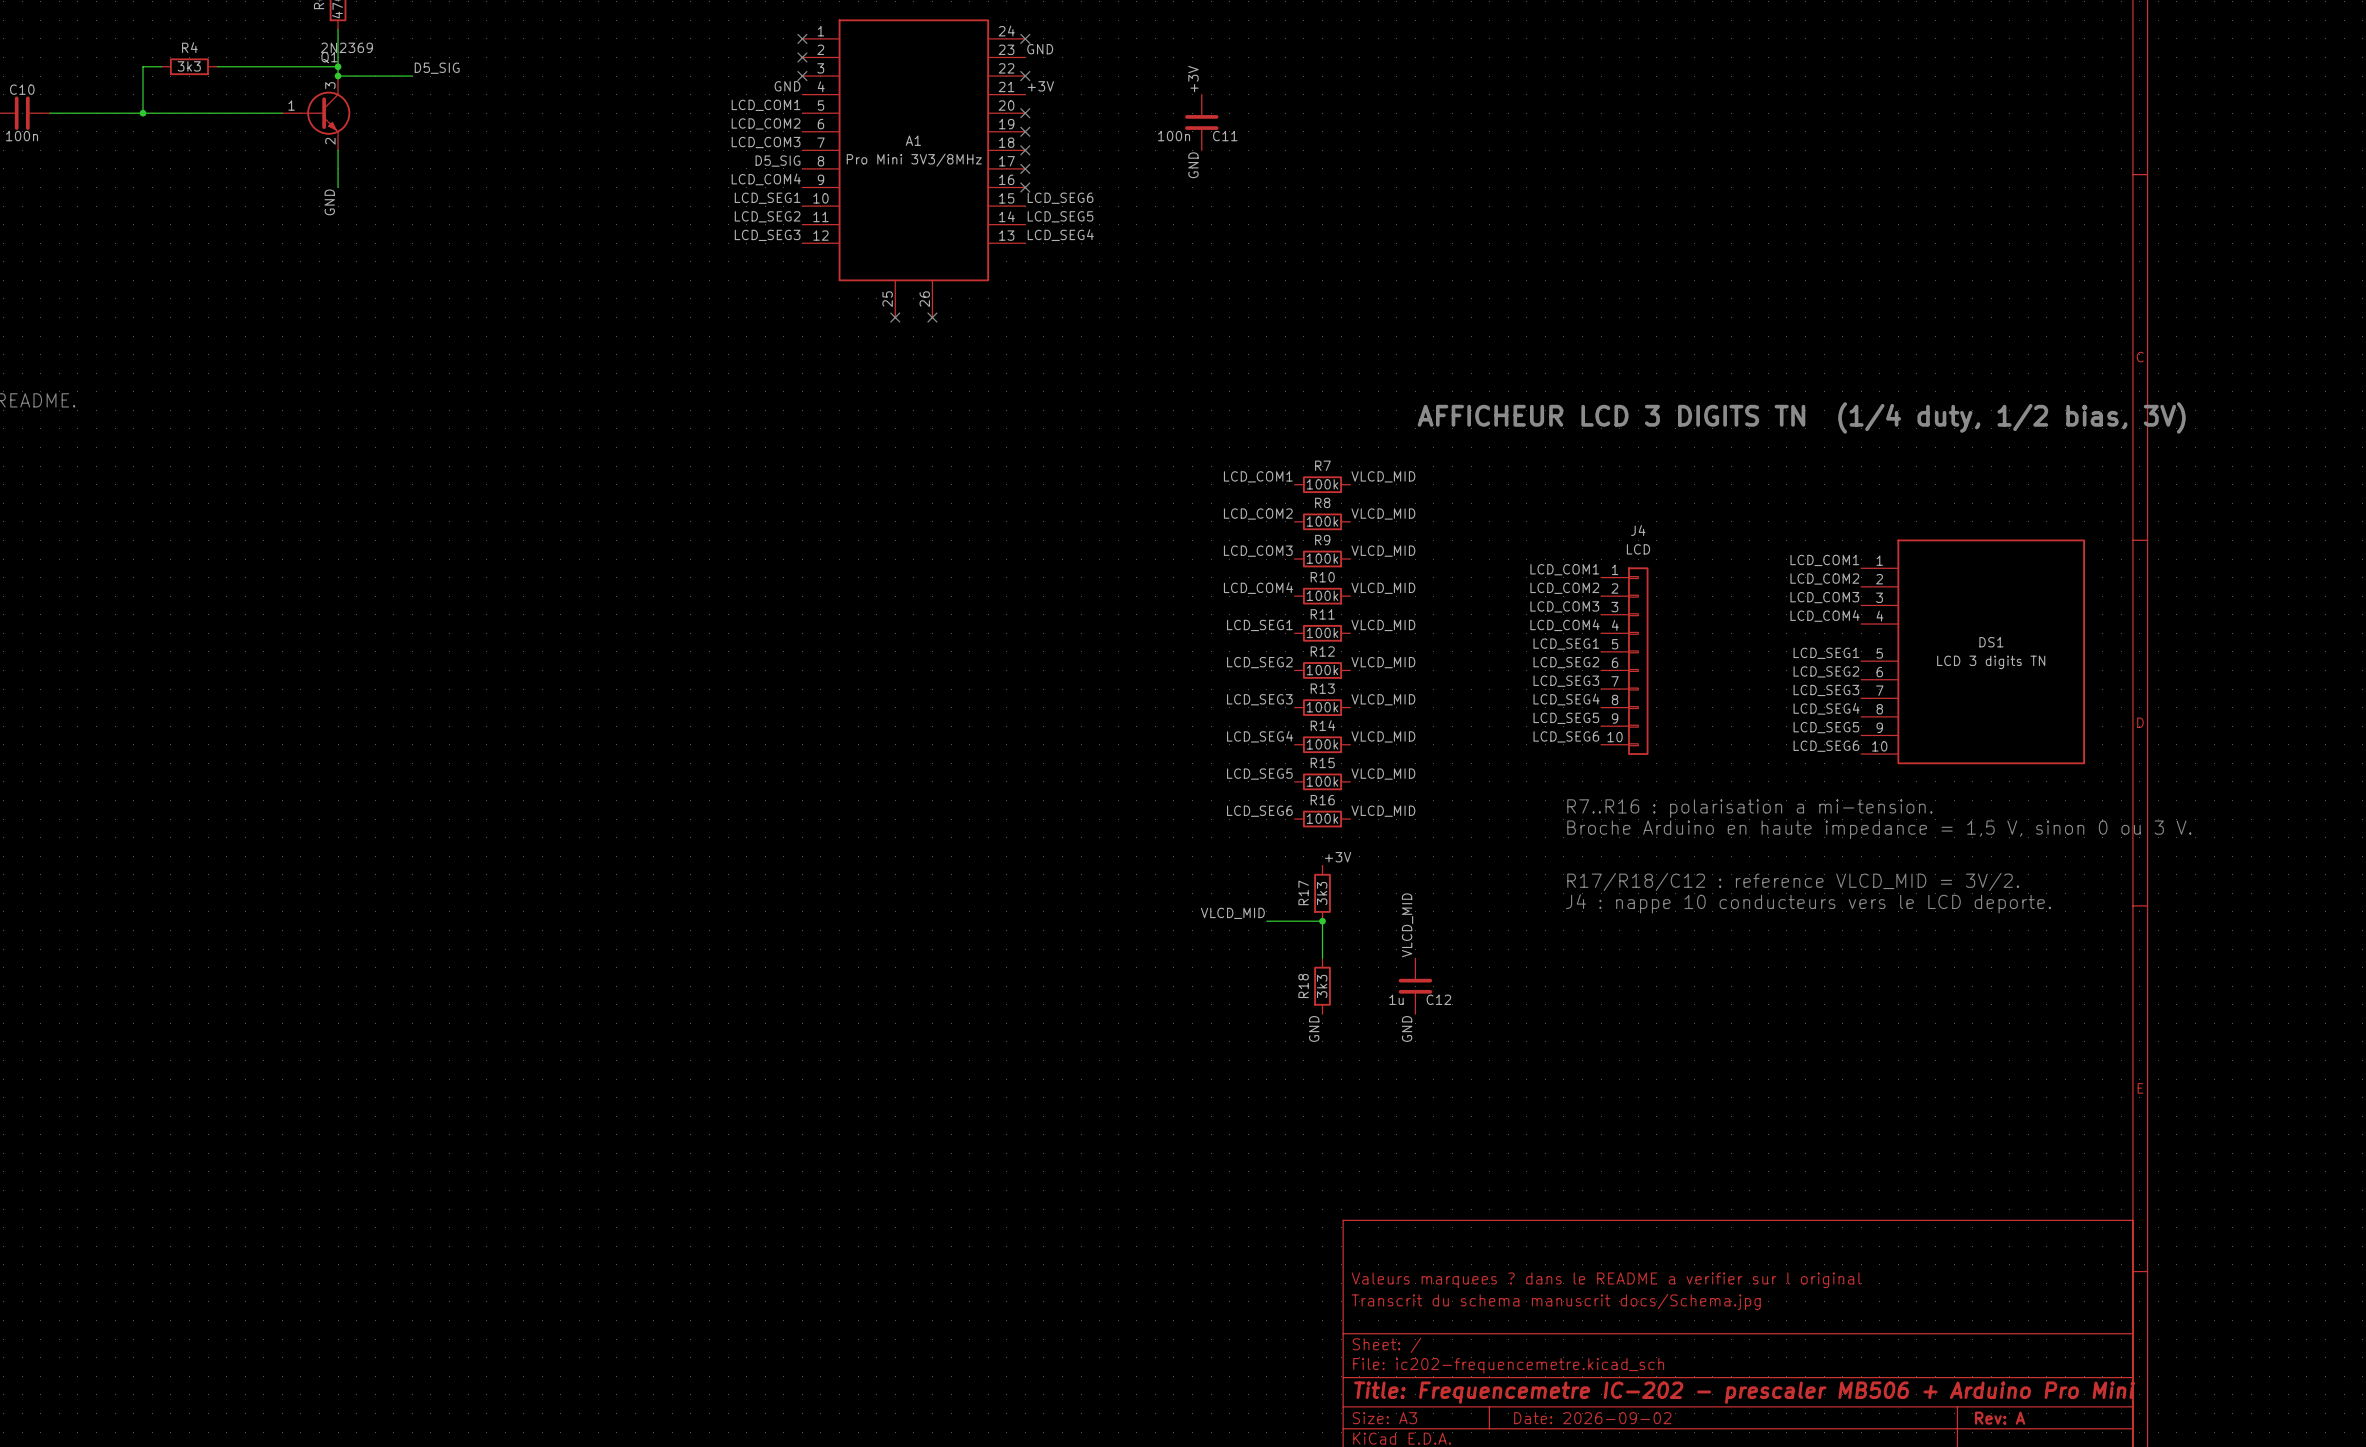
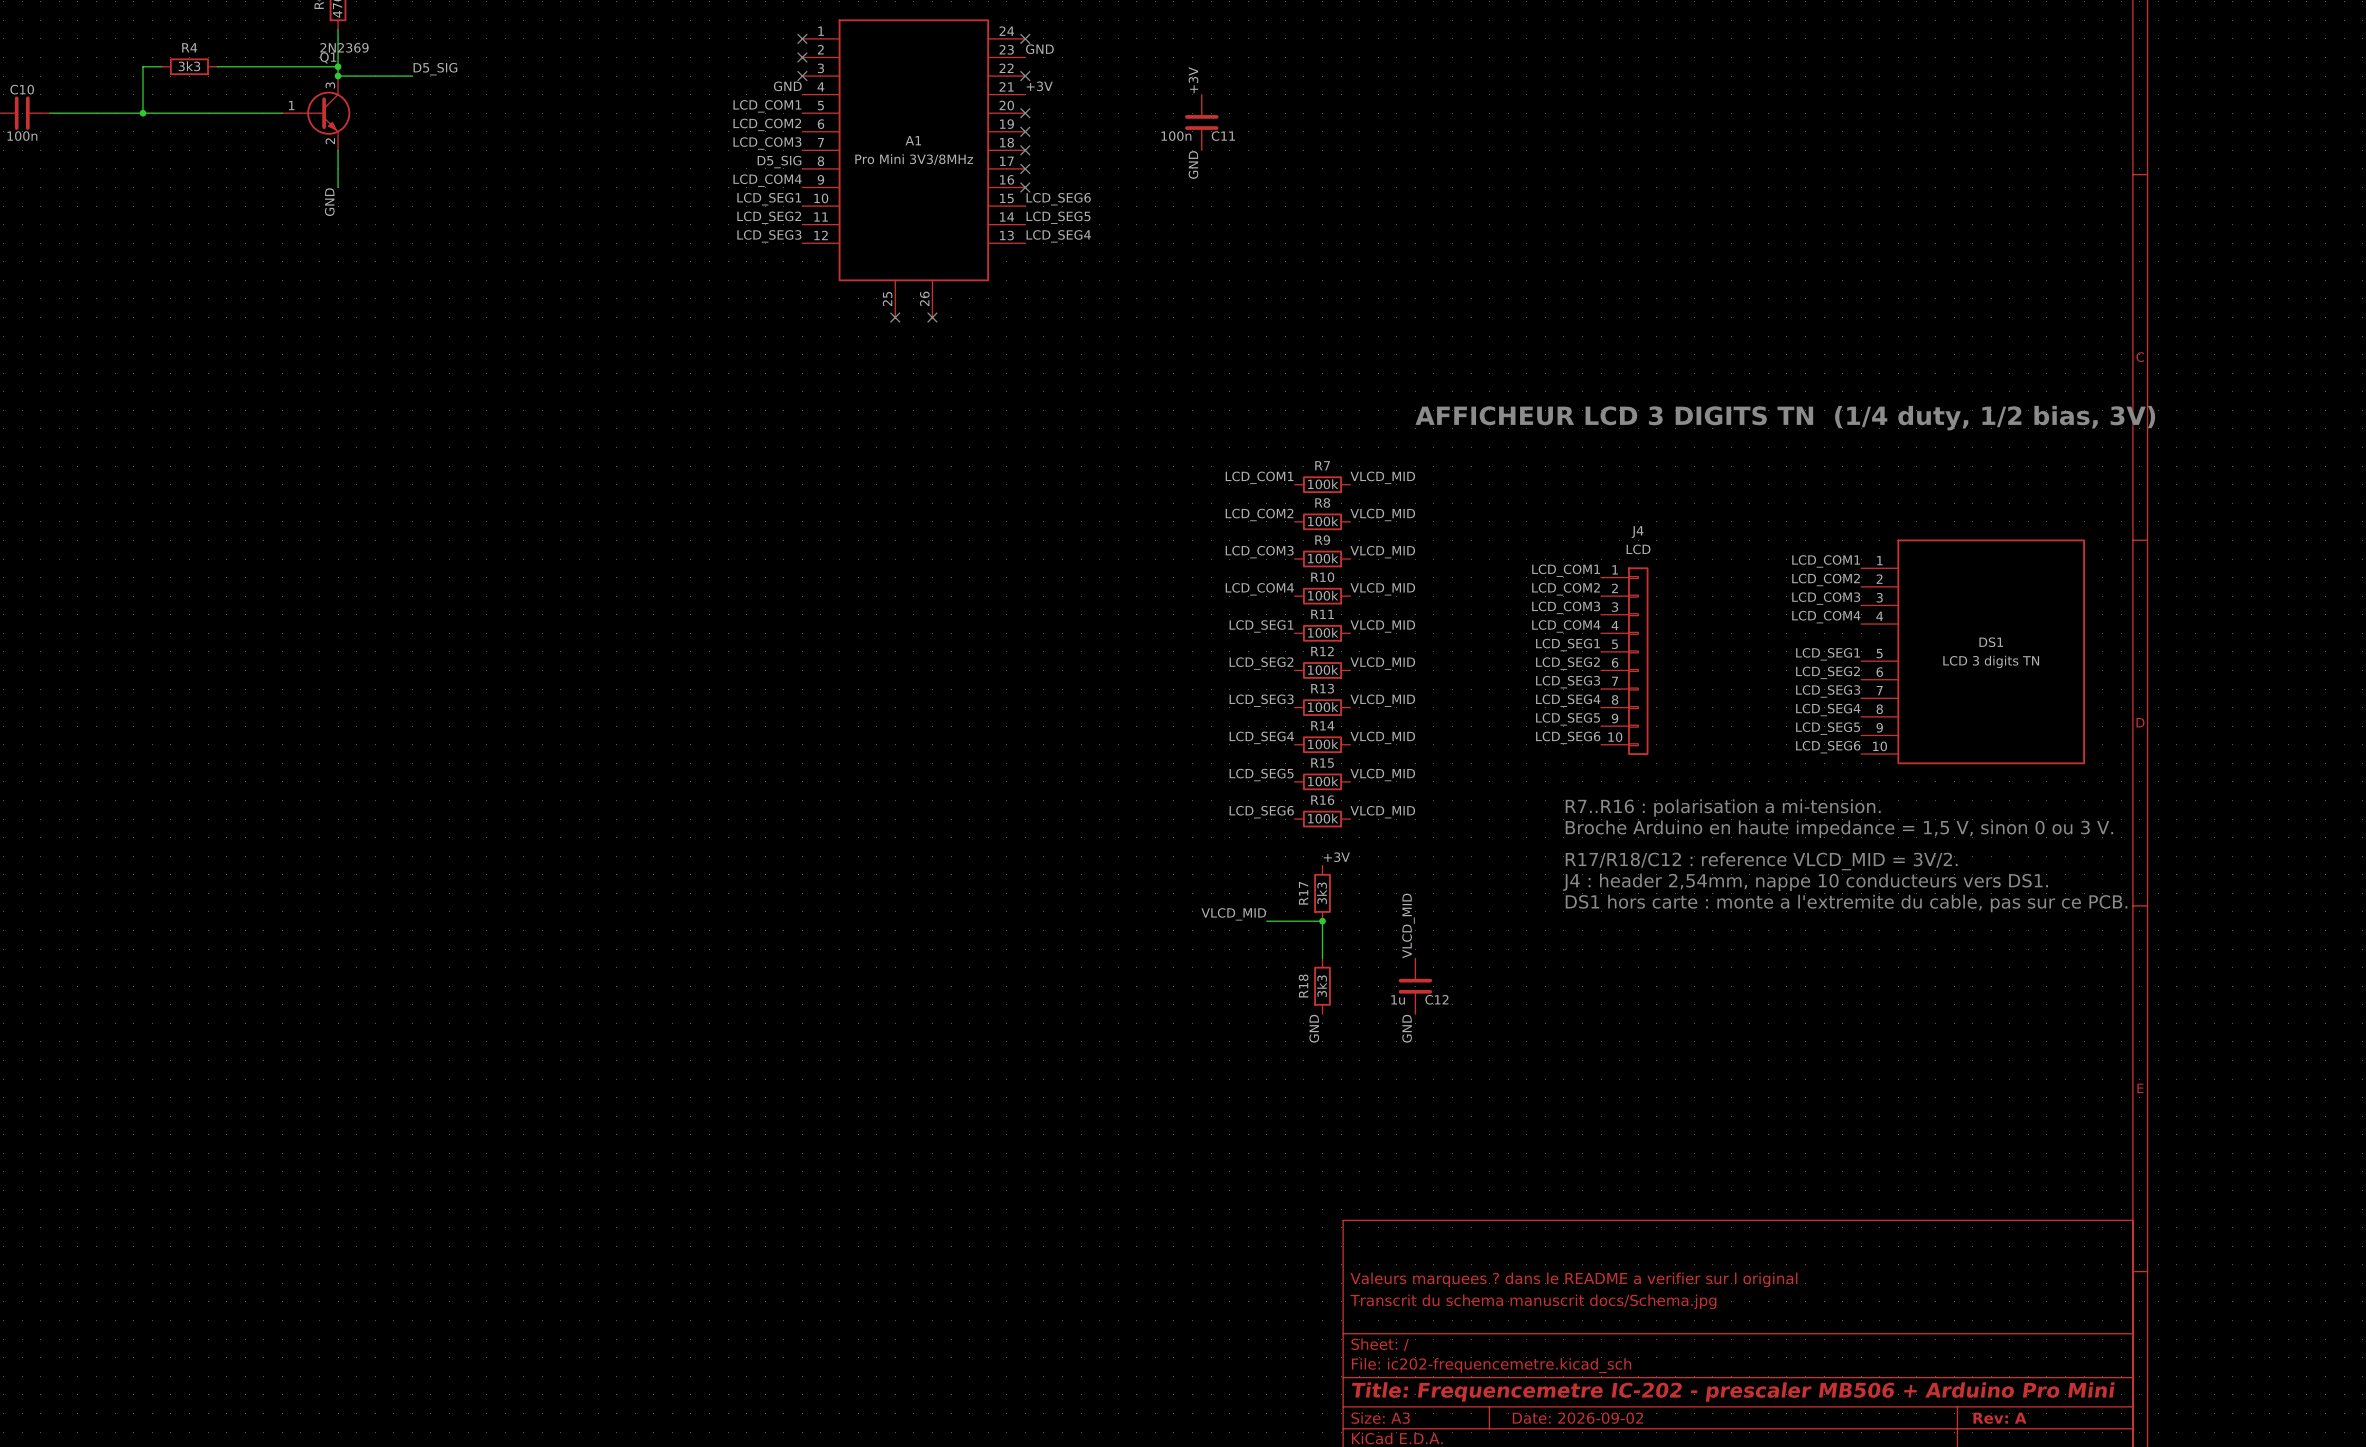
text: none -> R17/R18/C12 : reference VLCD_MID = 3V/2. (1761, 861)
text: R17/R18/C12 : reference VLCD_MID = 3V/2. (1793, 881) -> J4 : header 2,54mm, nappe 10 conducteurs vers DS1. (1805, 882)
text: J4 : nappe 10 conducteurs vers le LCD deporte. (1808, 903) -> DS1 hors carte : monte a l'extremite du cable, pas sur ce PCB. (1846, 903)

